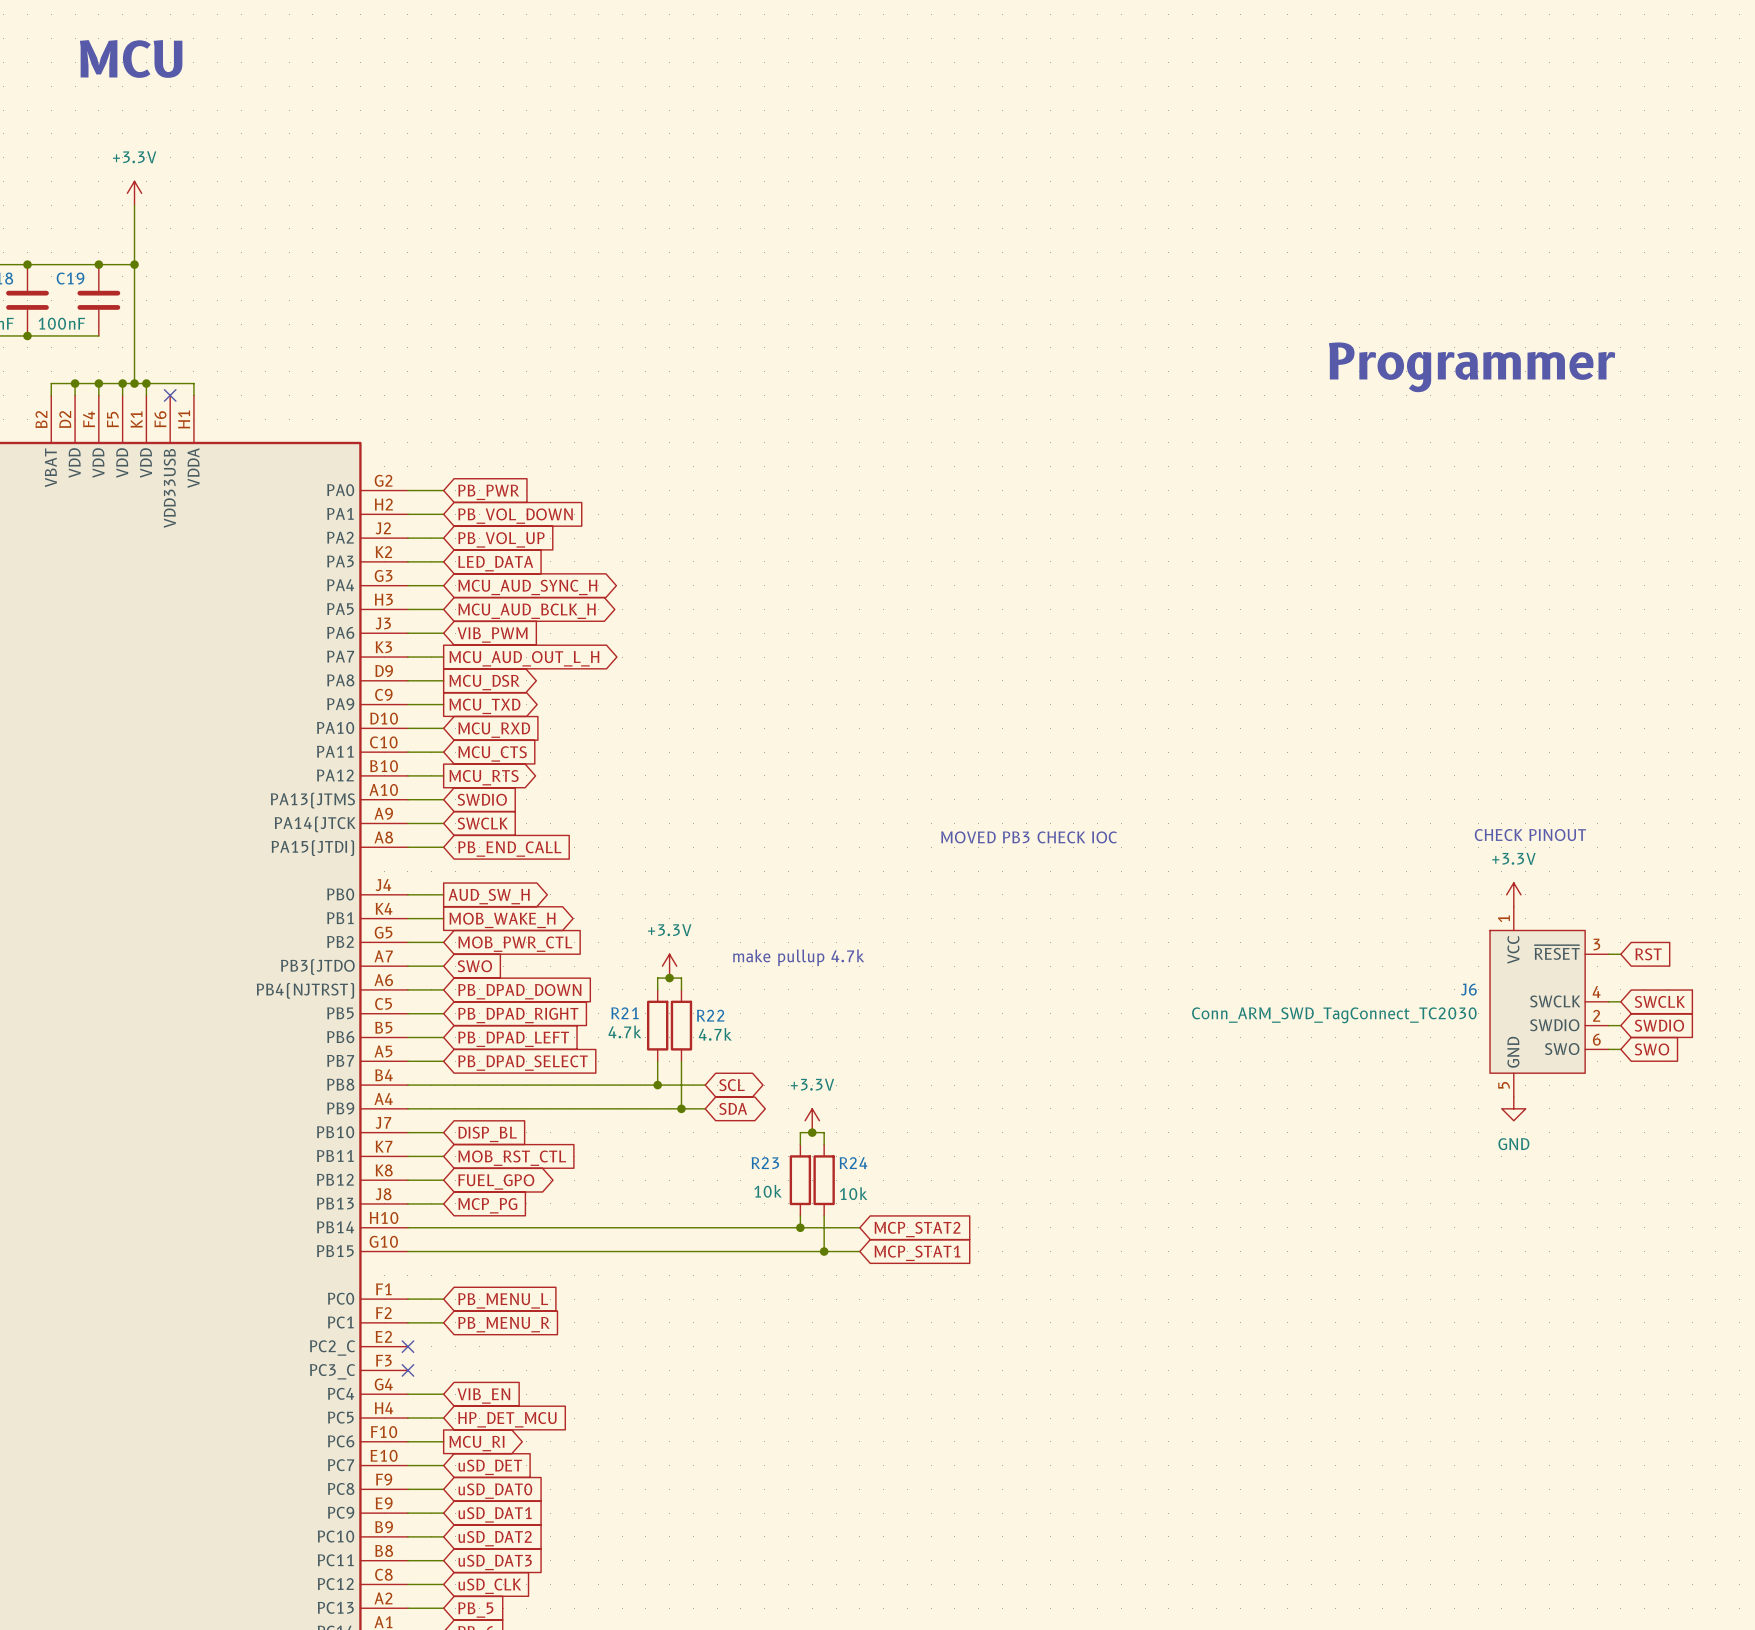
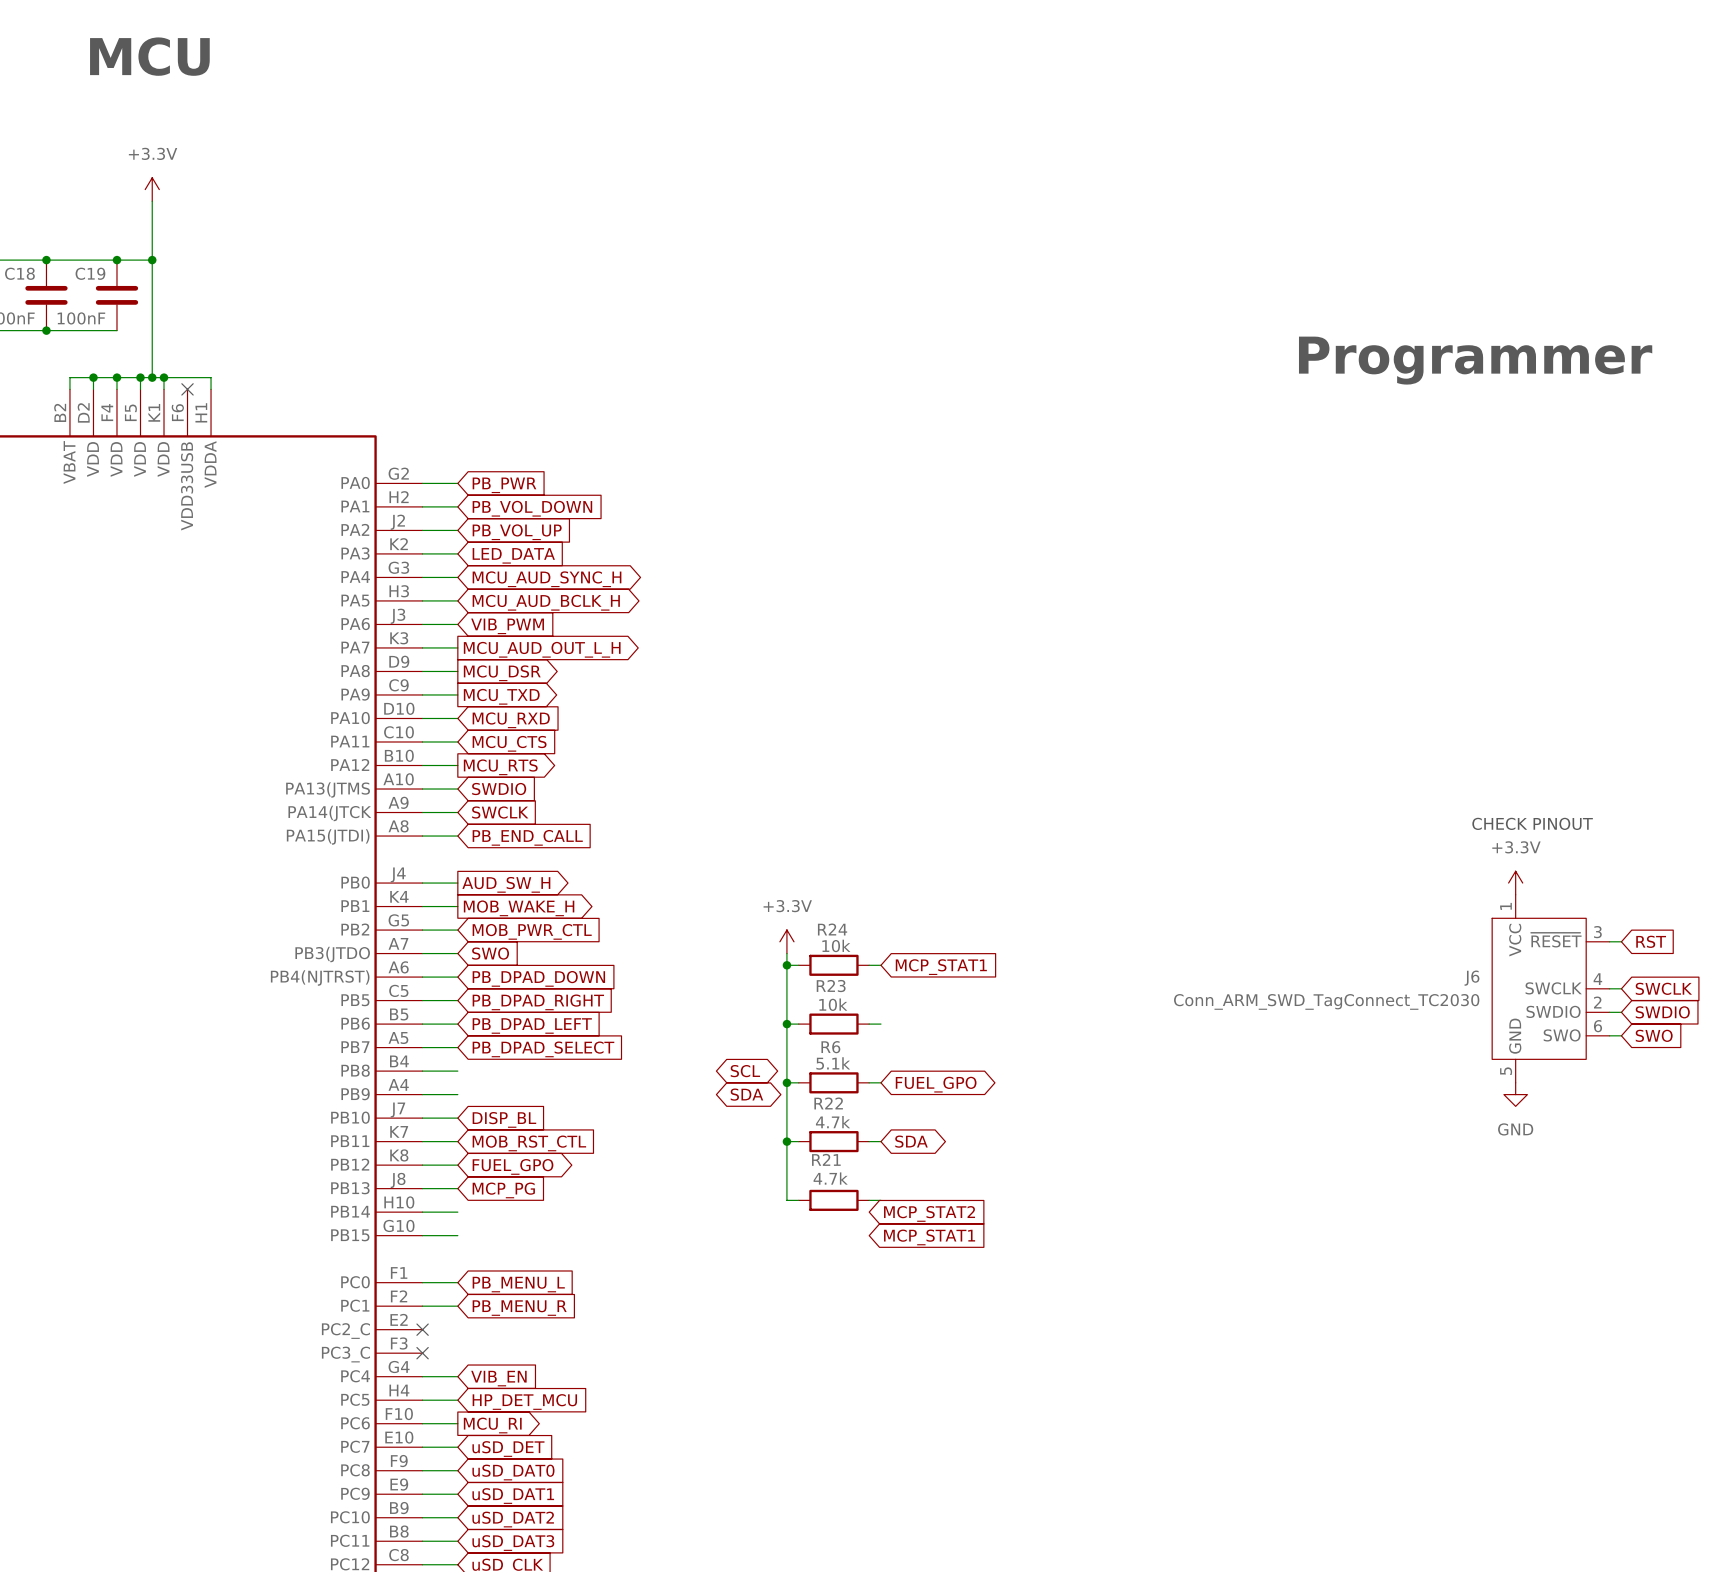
text: MOVED PB3 CHECK IOC (1029, 837) -> none
power symbol: none -> +3.3V (786, 941)
text: make pullup 4.7k (798, 957) -> none
power symbol: +3.3V (669, 966) -> none
wire: none -> (786, 953) (786, 1200) (798, 1200)
junction: (669, 978) -> none
wire: none -> (786, 965) (798, 965)
junction: none -> (786, 965)
wire: none -> (869, 965) (880, 965)
global label: none -> MCP_STAT1 (941, 967)
wire: (657, 989) (657, 978) (681, 978) (681, 989) -> none
R21 name position: R21 (625, 1013) -> R21 (826, 1159)
R22 name position: R22 (710, 1015) -> R22 (828, 1103)
R21 rotation: 0° (657, 1025) -> 90° clockwise (833, 1200)
R21 position: (657, 1025) -> (833, 1200)
R22 rotation: 0° (681, 1025) -> 90° clockwise (833, 1141)
R22 position: (681, 1025) -> (833, 1141)
R22 value position: 4.7k (715, 1034) -> 4.7k (833, 1122)
wire: none -> (786, 1024) (798, 1024)
junction: none -> (786, 1024)
wire: none -> (869, 1024) (880, 1024)
wire: (657, 1061) (657, 1085) -> none
wire: (681, 1061) (681, 1108) -> none
wire: (443, 1085) (705, 1085) -> none
junction: (657, 1085) -> none
wire: none -> (786, 1082) (798, 1082)
junction: none -> (786, 1082)
R6: none -> 5.1k (833, 1082)
wire: none -> (869, 1082) (880, 1082)
global label: none -> FUEL_GPO (936, 1084)
wire: (443, 1108) (705, 1108) -> none
junction: (681, 1108) -> none
power symbol: +3.3V (812, 1120) -> none
junction: (812, 1132) -> none
wire: (800, 1144) (800, 1132) (824, 1132) (824, 1144) -> none
wire: none -> (786, 1141) (798, 1141)
junction: none -> (786, 1141)
wire: none -> (869, 1141) (880, 1141)
global label: none -> SDA (911, 1141)
R24 name position: R24 (853, 1163) -> R24 (832, 929)
R23 rotation: 0° (800, 1180) -> 90° clockwise (833, 1024)
R23 position: (800, 1180) -> (833, 1024)
R24 rotation: 0° (824, 1180) -> 90° clockwise (833, 965)
R24 position: (824, 1180) -> (833, 965)
R24 value position: 10k (853, 1193) -> 10k (836, 945)
wire: (824, 1215) (824, 1251) -> none
wire: none -> (869, 1200) (880, 1200)
wire: (443, 1227) (859, 1227) -> none
junction: (800, 1227) -> none
wire: (443, 1251) (859, 1251) -> none
junction: (824, 1251) -> none

